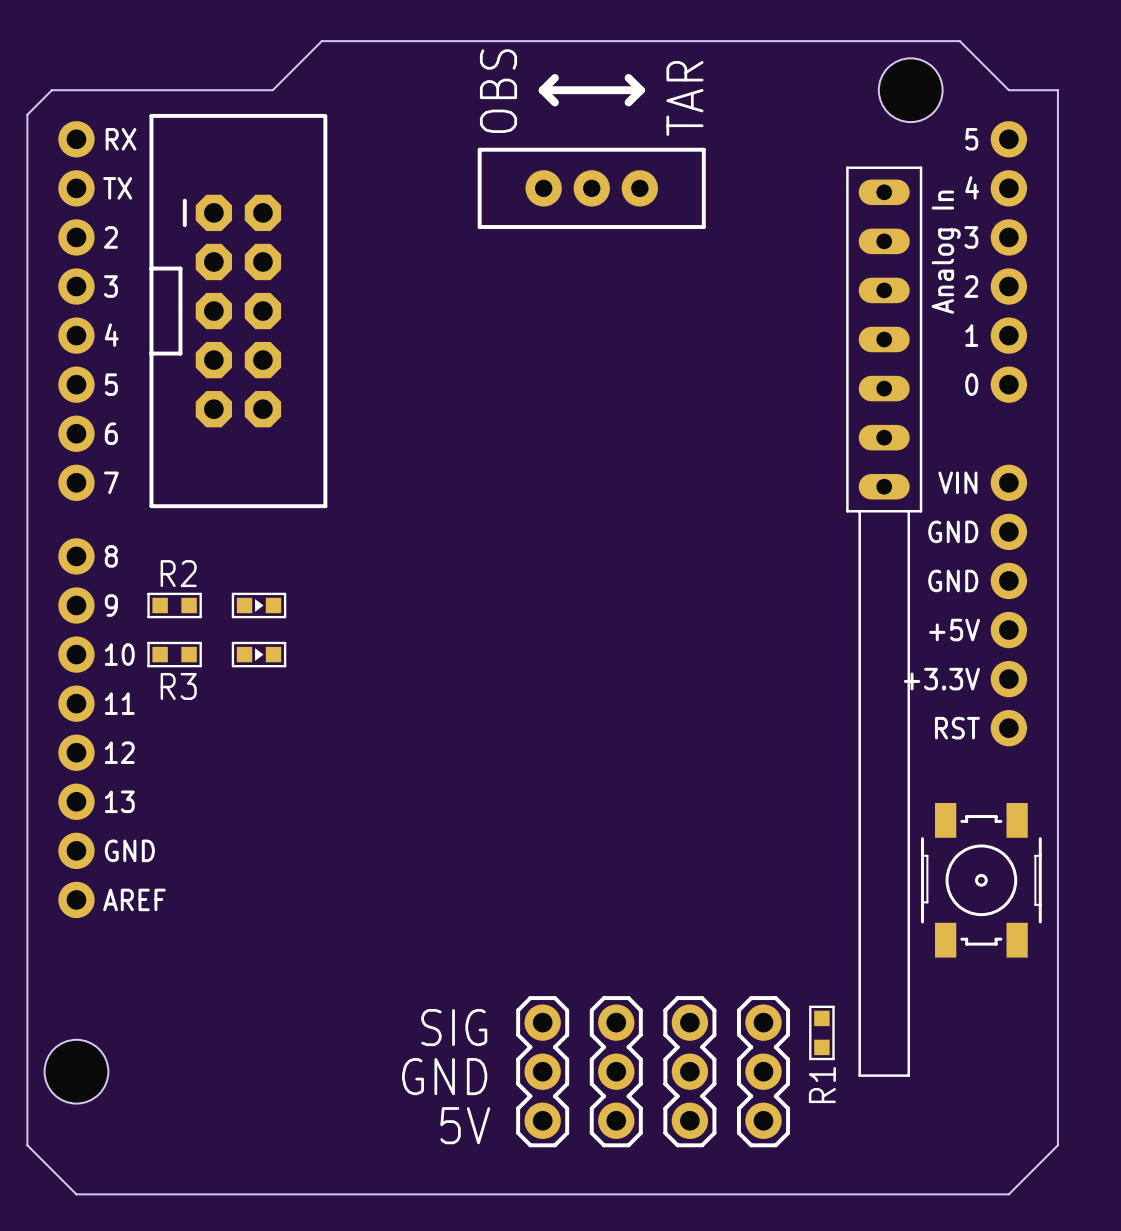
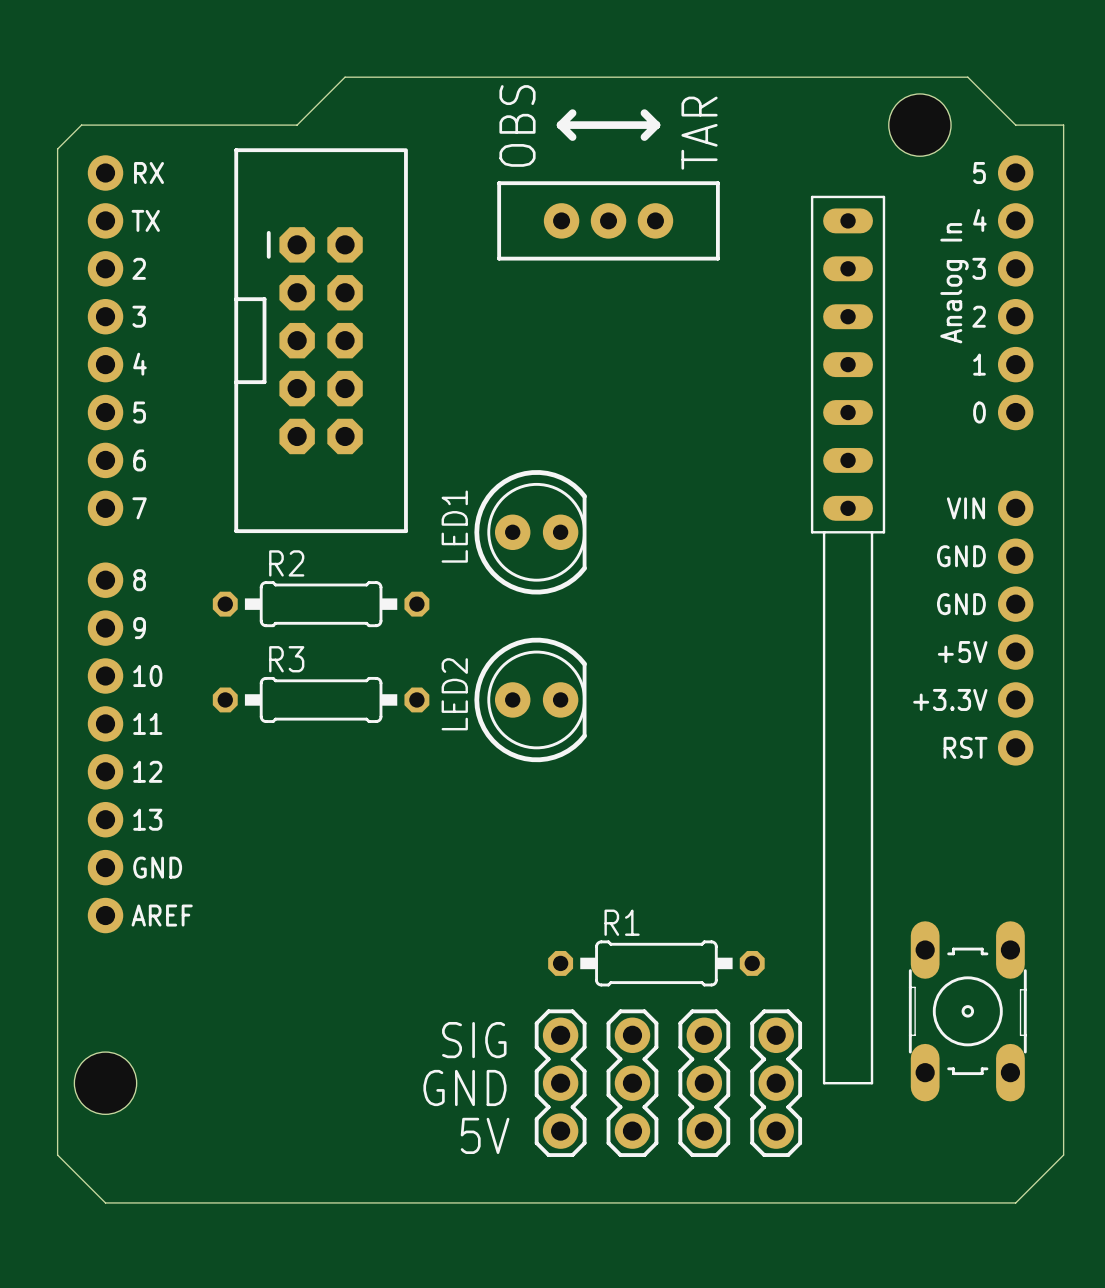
part position: (238, 311) -> (321, 340)
LED1: none -> (530, 532)
R2 name position: R2 (178, 573) -> R2 (286, 563)
R2 footprint: [147, 592, 202, 619] -> [212, 581, 430, 628]
part: (259, 605) -> none
part position: (884, 621) -> (848, 640)
R3 footprint: [147, 641, 202, 668] -> [212, 676, 430, 723]
part: (259, 654) -> none
LED2: none -> (530, 699)
R3 name position: R3 (178, 686) -> R3 (286, 659)
part: (981, 880) -> none
part: none -> (967, 1011)
R1 footprint: [809, 1005, 835, 1061] -> [548, 940, 765, 987]
R1 name position: R1 (822, 1085) -> R1 (622, 922)

